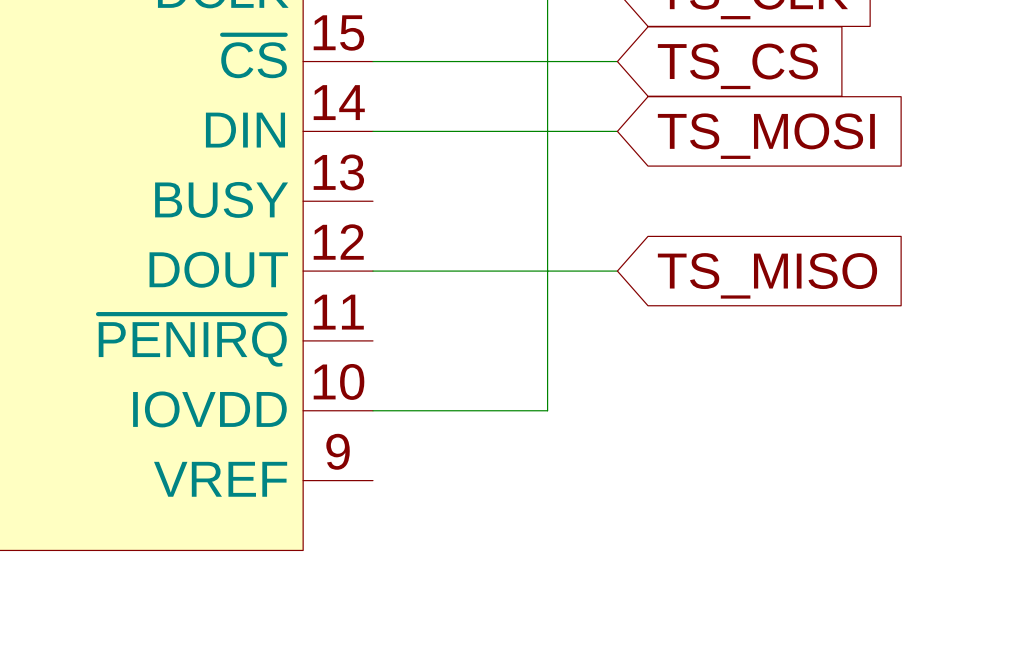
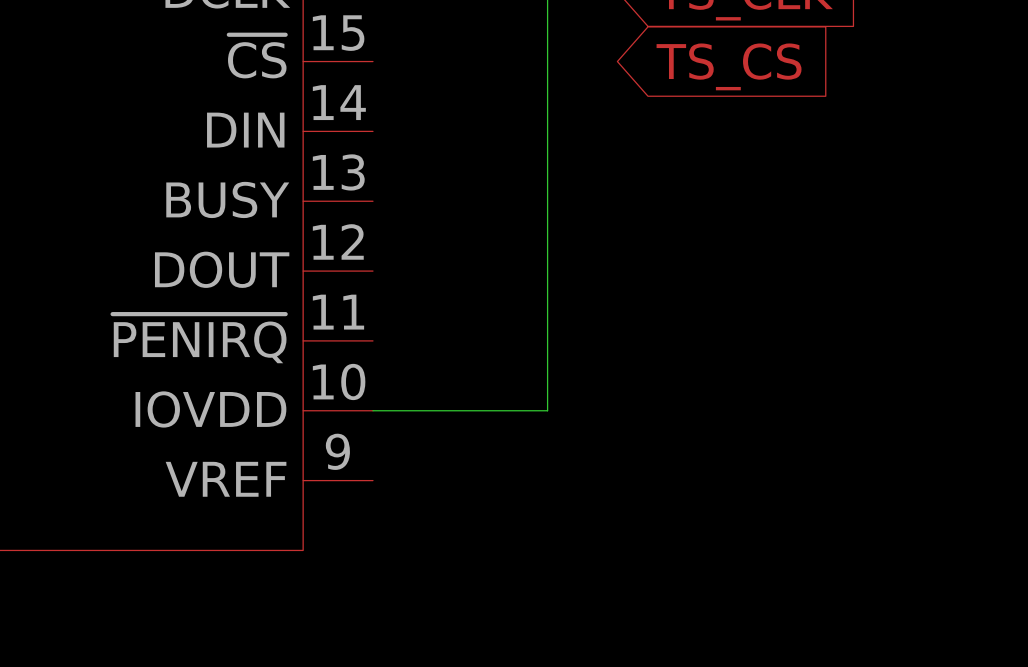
wire: (372, 61) (617, 61) -> none
wire: (372, 131) (617, 131) -> none
global label: TS_MOSI (766, 136) -> none
wire: (372, 271) (617, 271) -> none
global label: TS_MISO (767, 275) -> none

